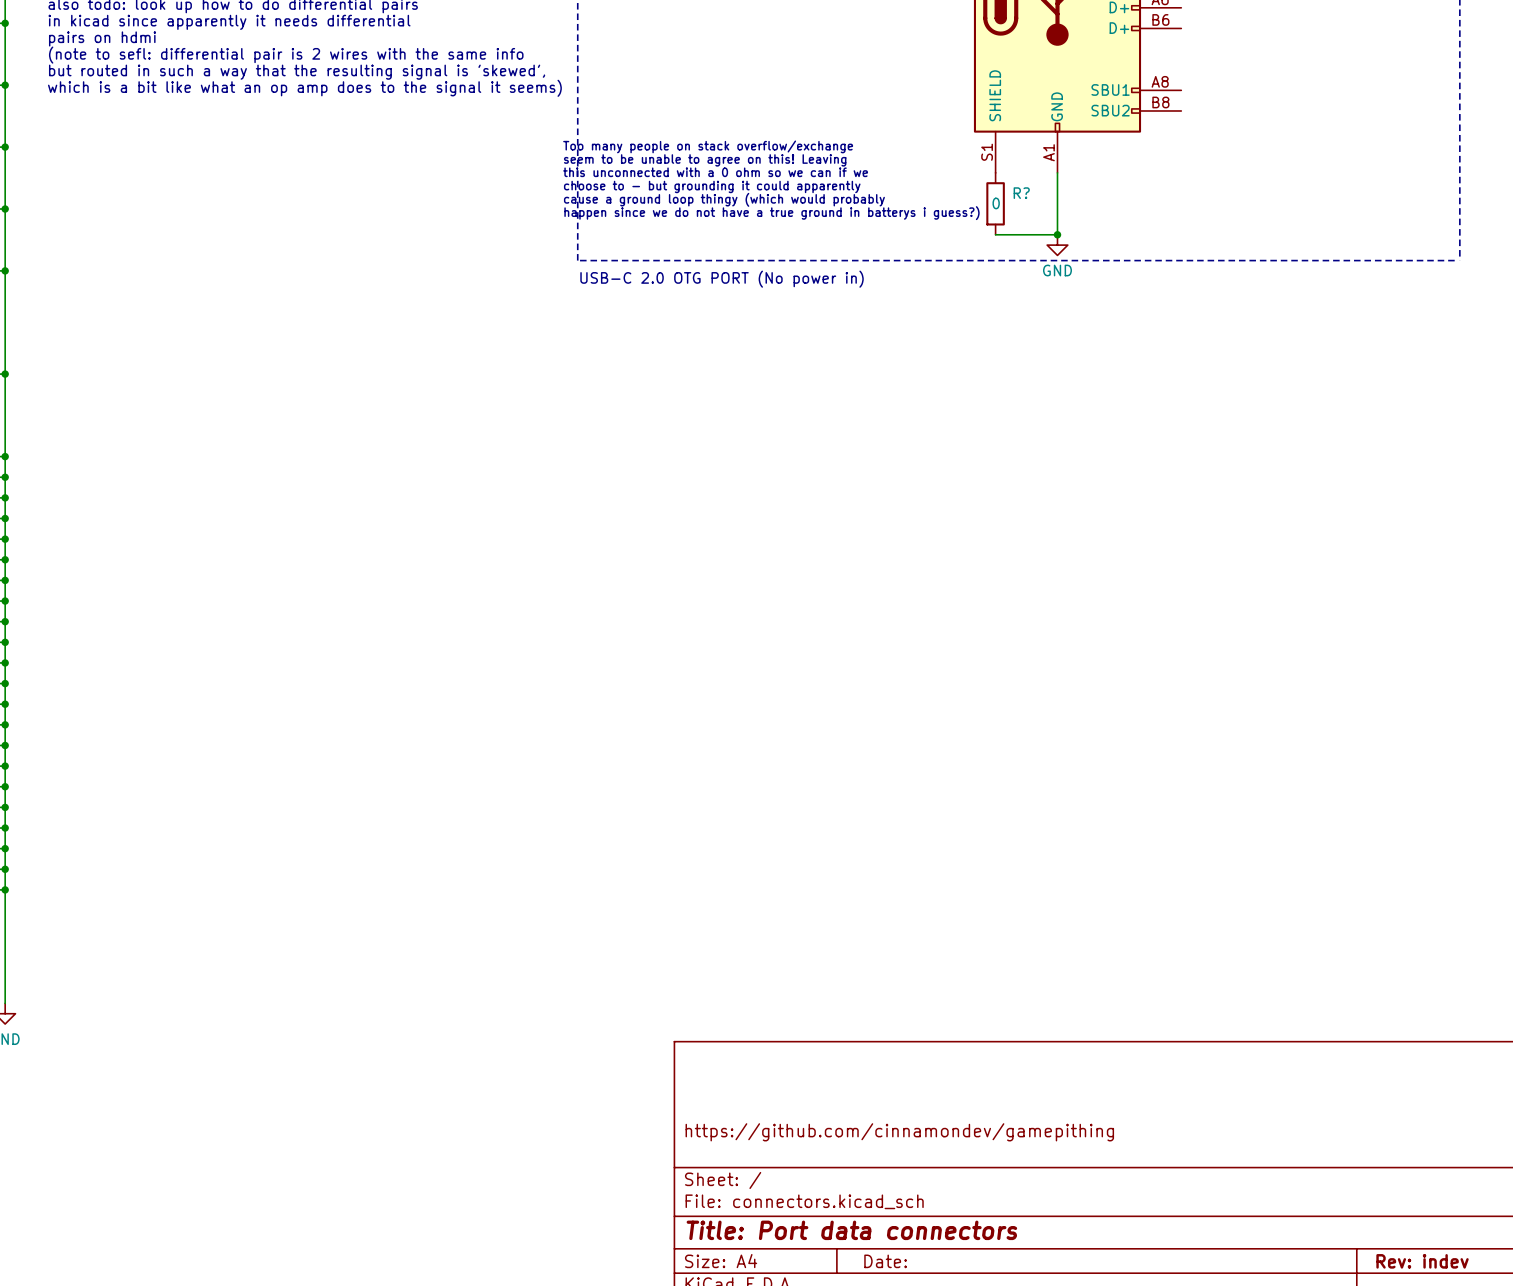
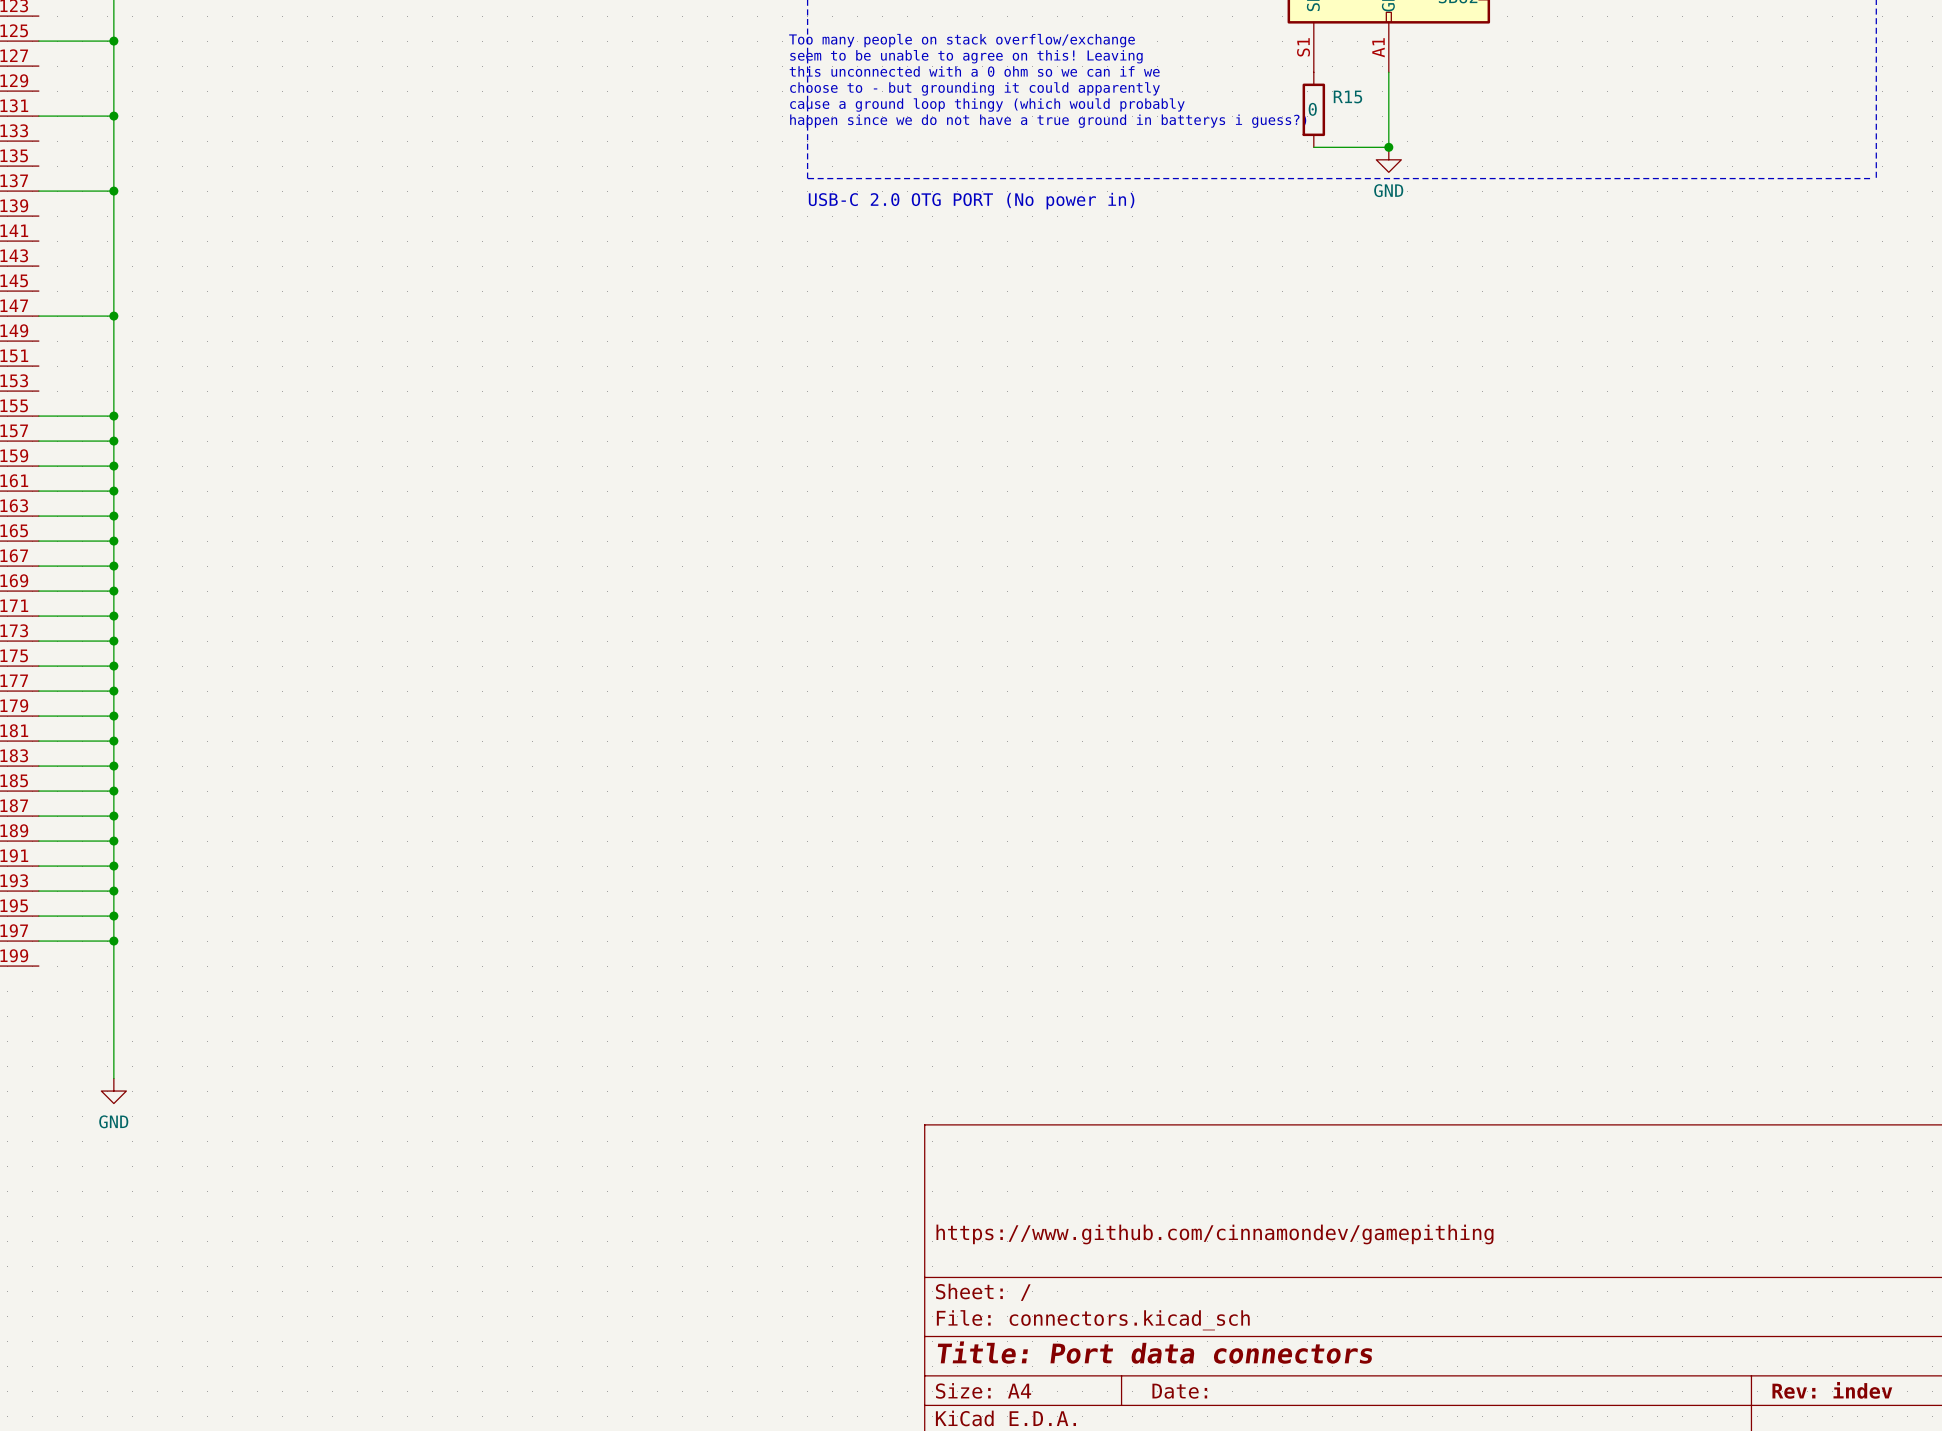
R? name: R? (1021, 193) -> R15 (1347, 96)
title block: https://github.com/cinnamondev/gamepithing (899, 1132) -> https://www.github.com/cinnamondev/gamepithing (1214, 1234)

